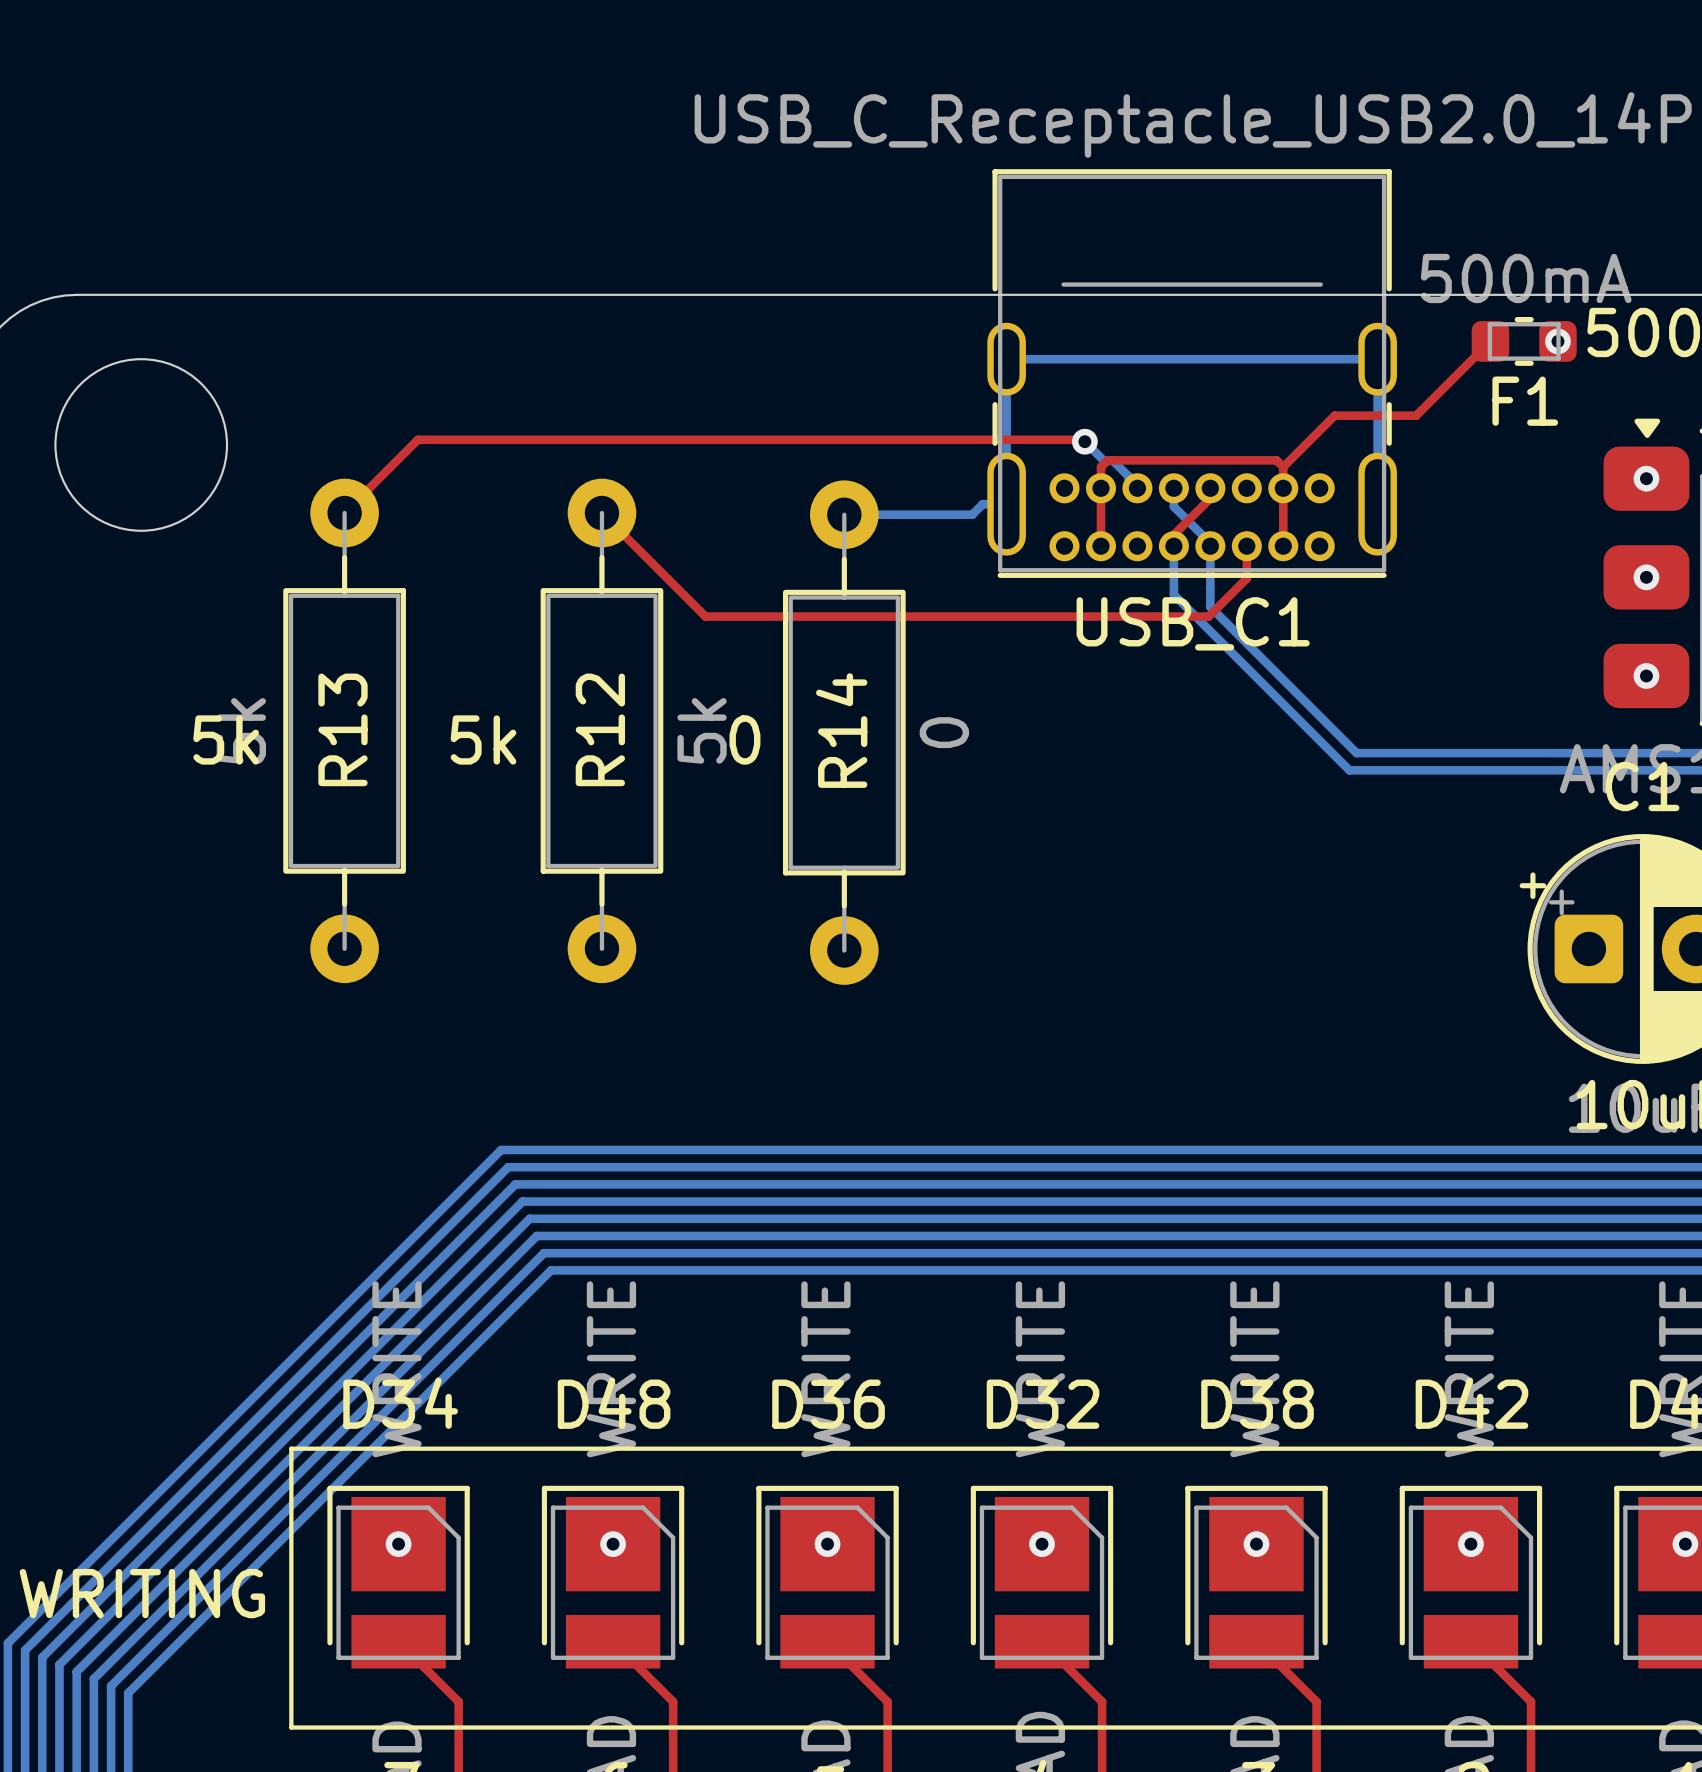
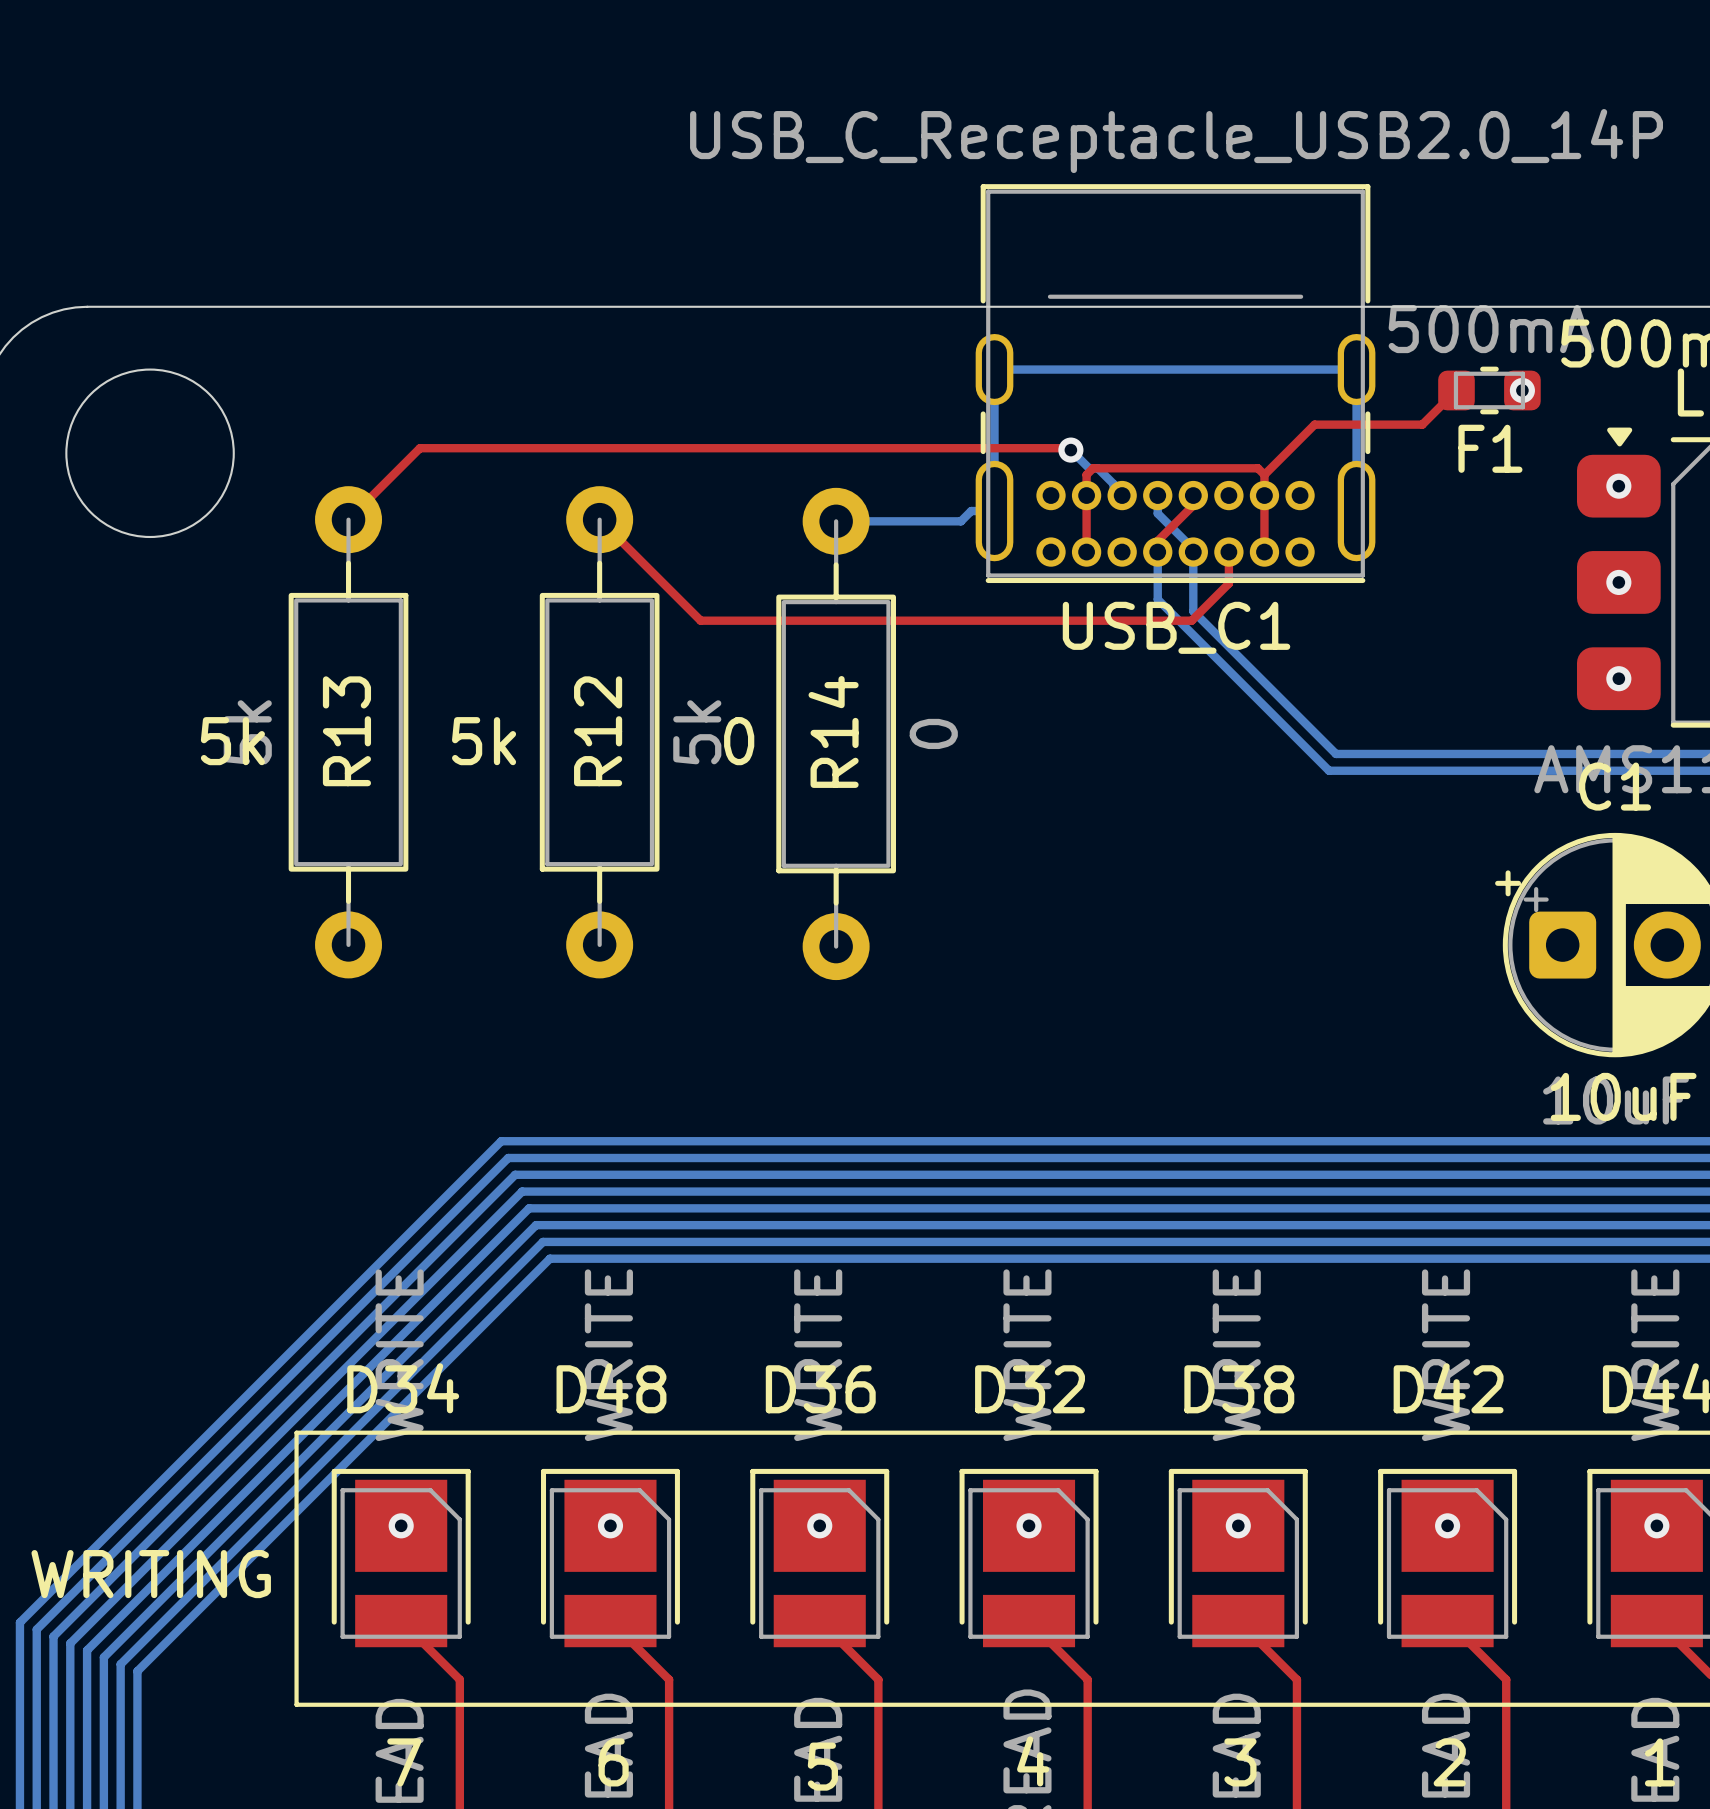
top track: (1490, 341) (1416, 415) -> (1456, 390) (1422, 424) (1394, 424)
F1 position: (1524, 341) -> (1489, 390)
via position: (1557, 341) -> (1522, 390)

